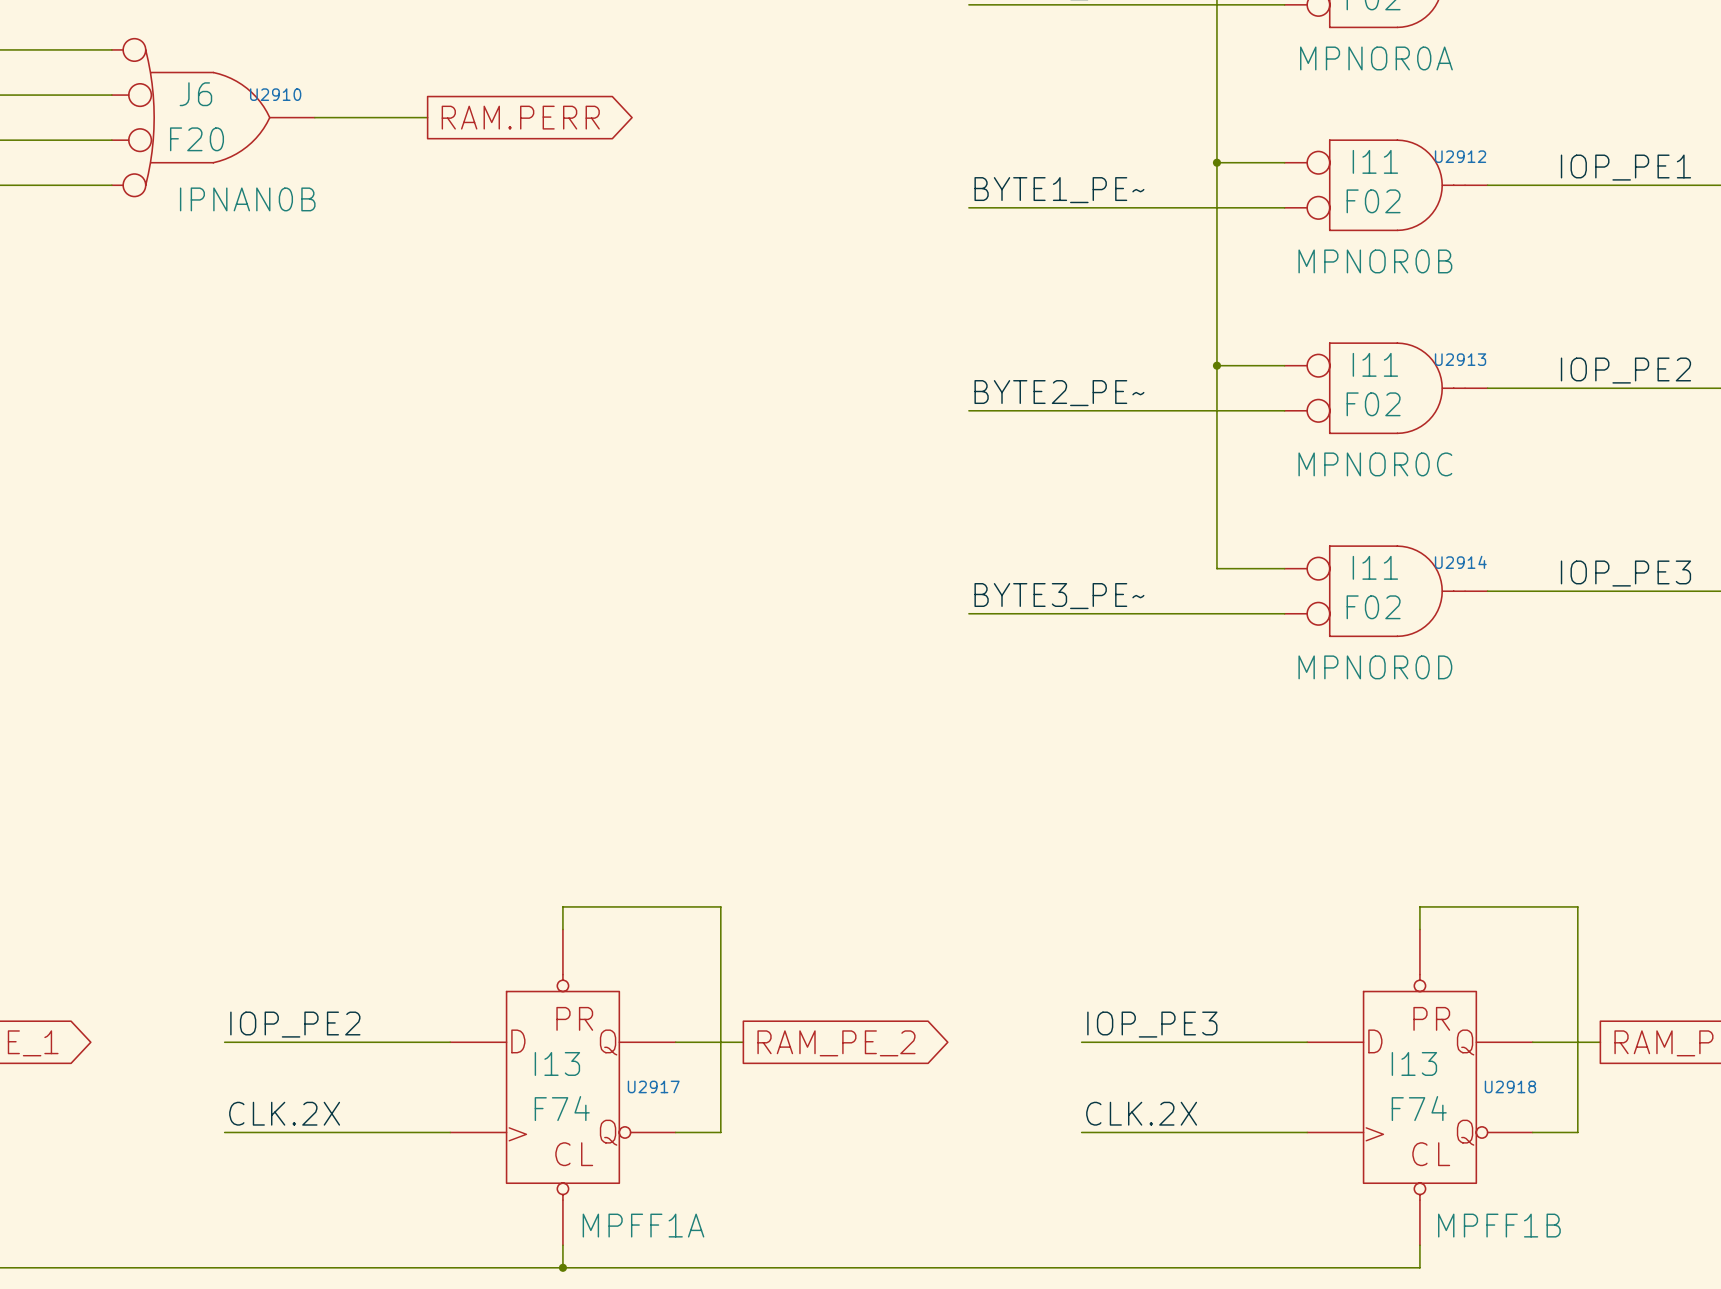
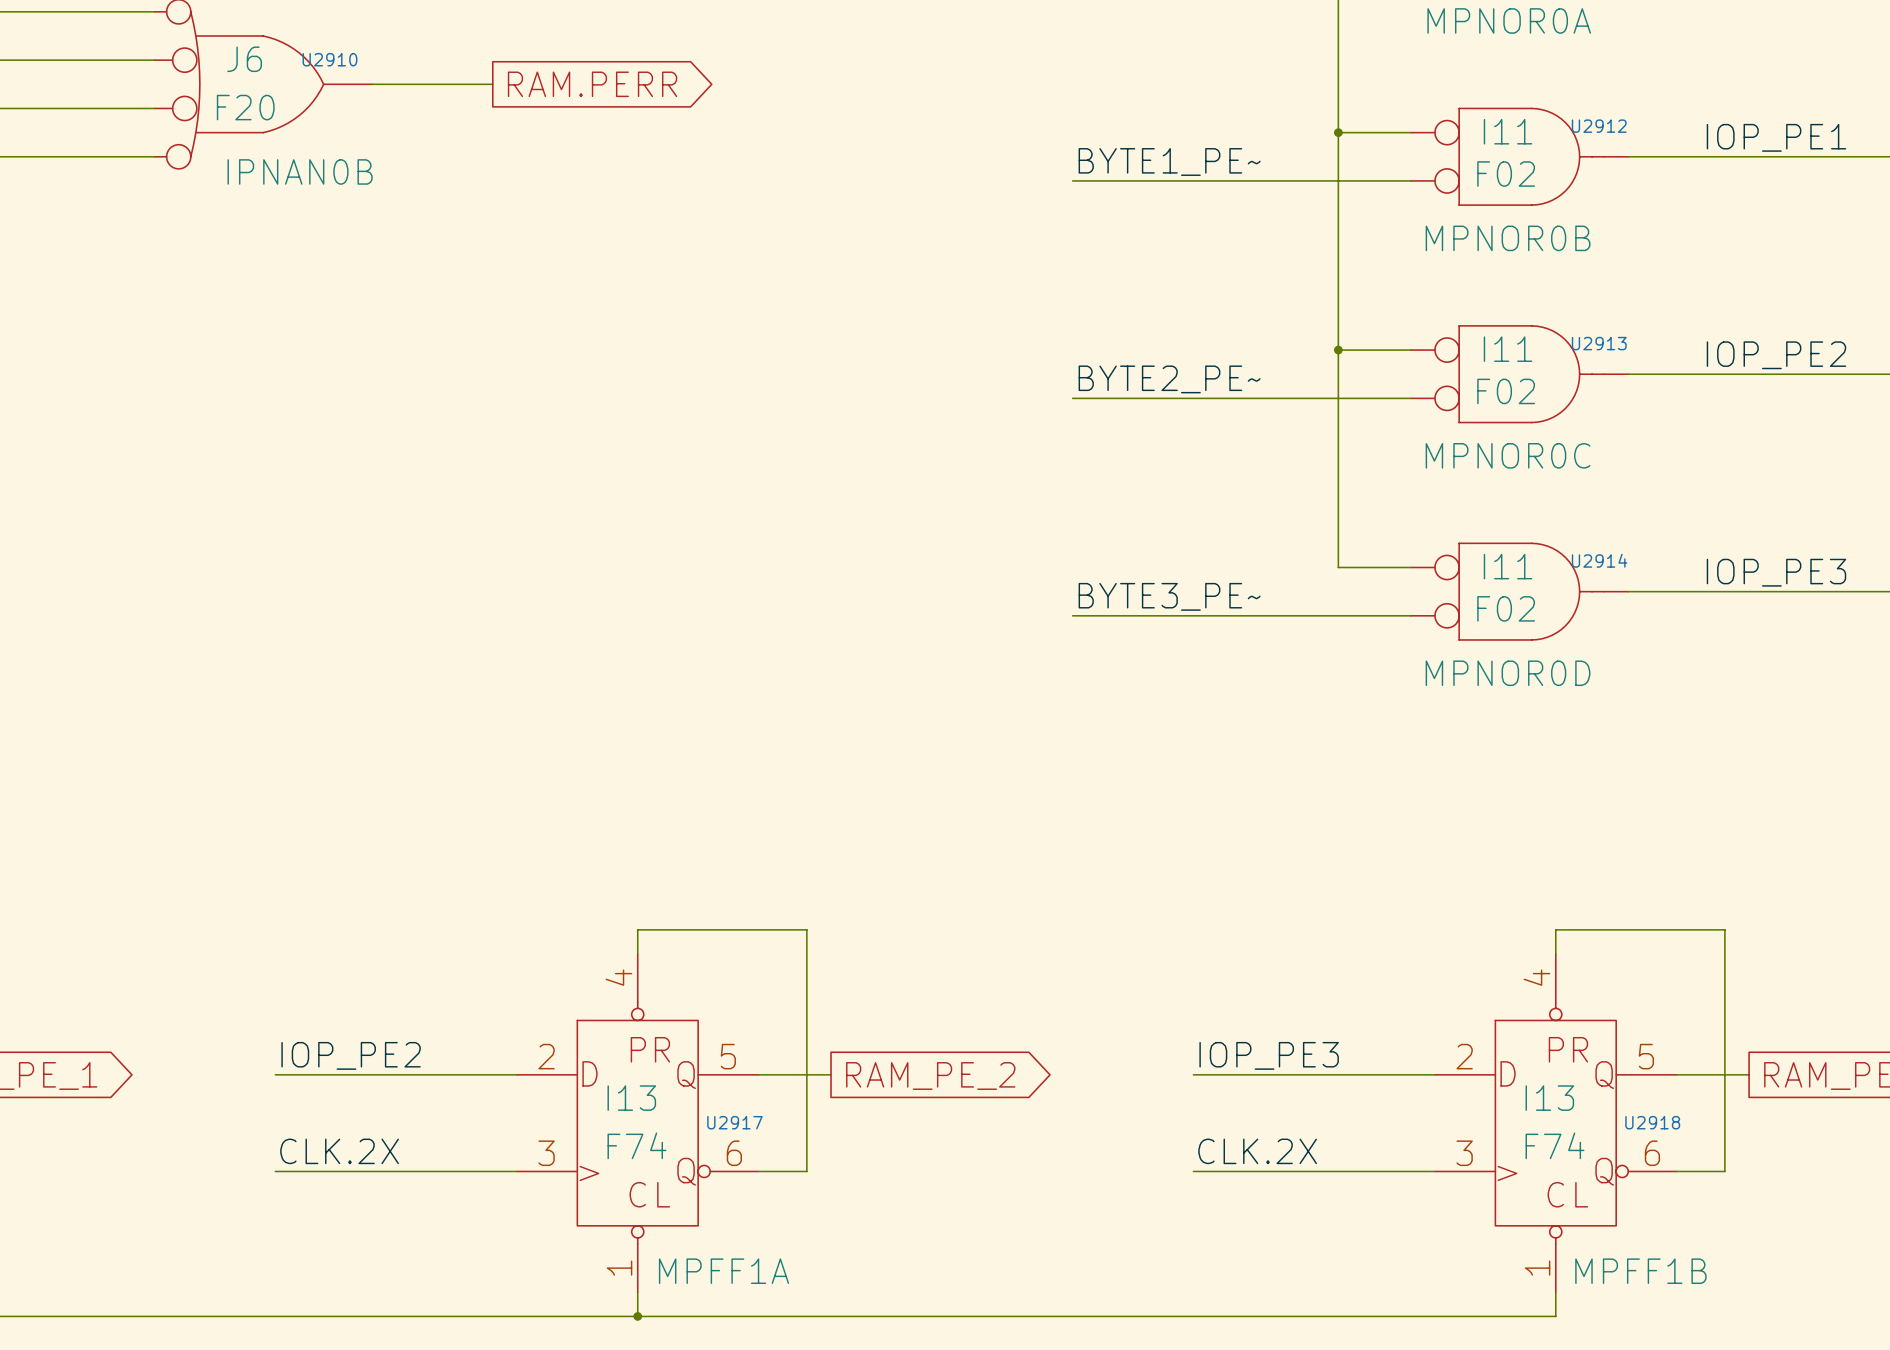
U2917 pin number: none -> 4 (618, 977)
U2918 pin number: none -> 4 (1536, 977)
U2917 pin number: none -> 2 (546, 1056)
U2917 pin number: none -> 5 (728, 1056)
U2918 pin number: none -> 2 (1464, 1056)
U2918 pin number: none -> 5 (1646, 1056)
U2917 pin number: none -> 3 (546, 1153)
U2917 pin number: none -> 6 (734, 1153)
U2918 pin number: none -> 3 (1464, 1153)
U2918 pin number: none -> 6 (1652, 1153)
U2917 pin number: none -> 1 (619, 1268)
U2918 pin number: none -> 1 (1537, 1268)

